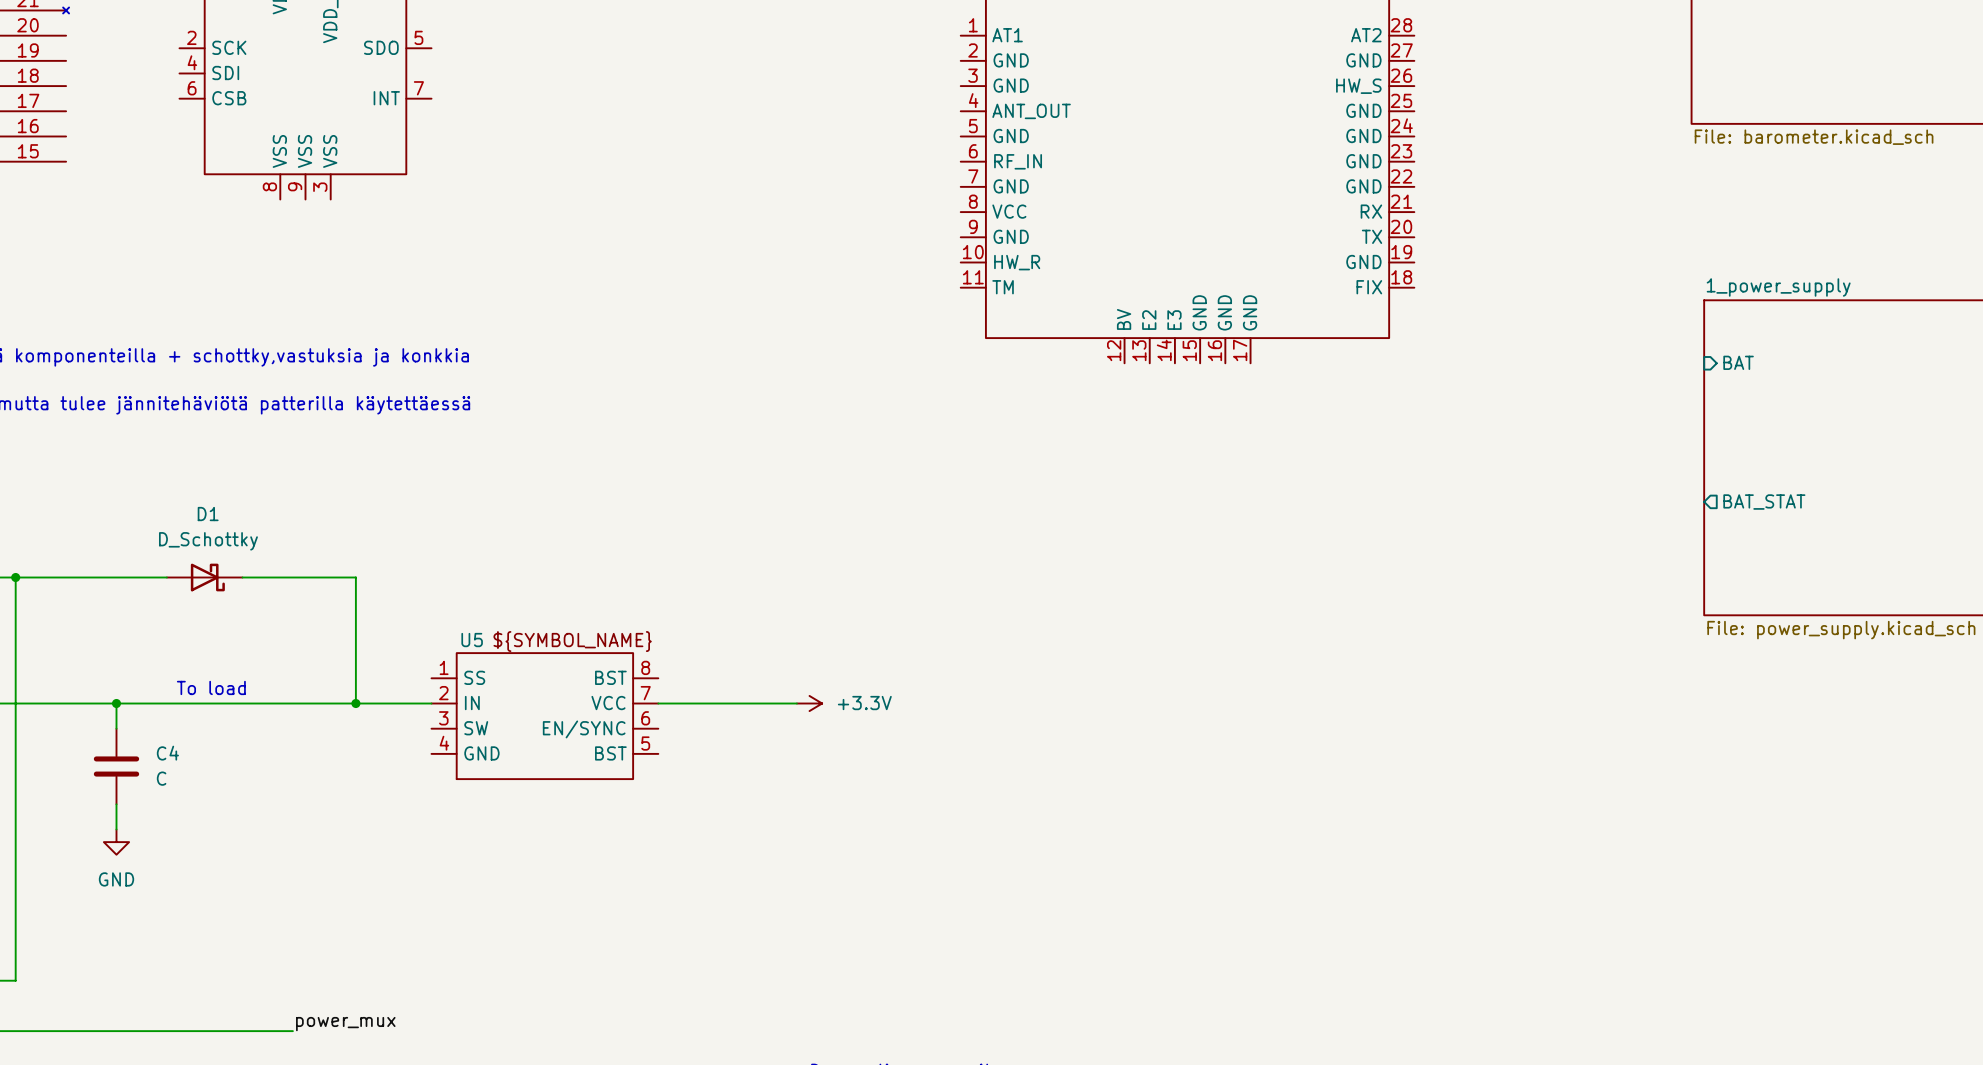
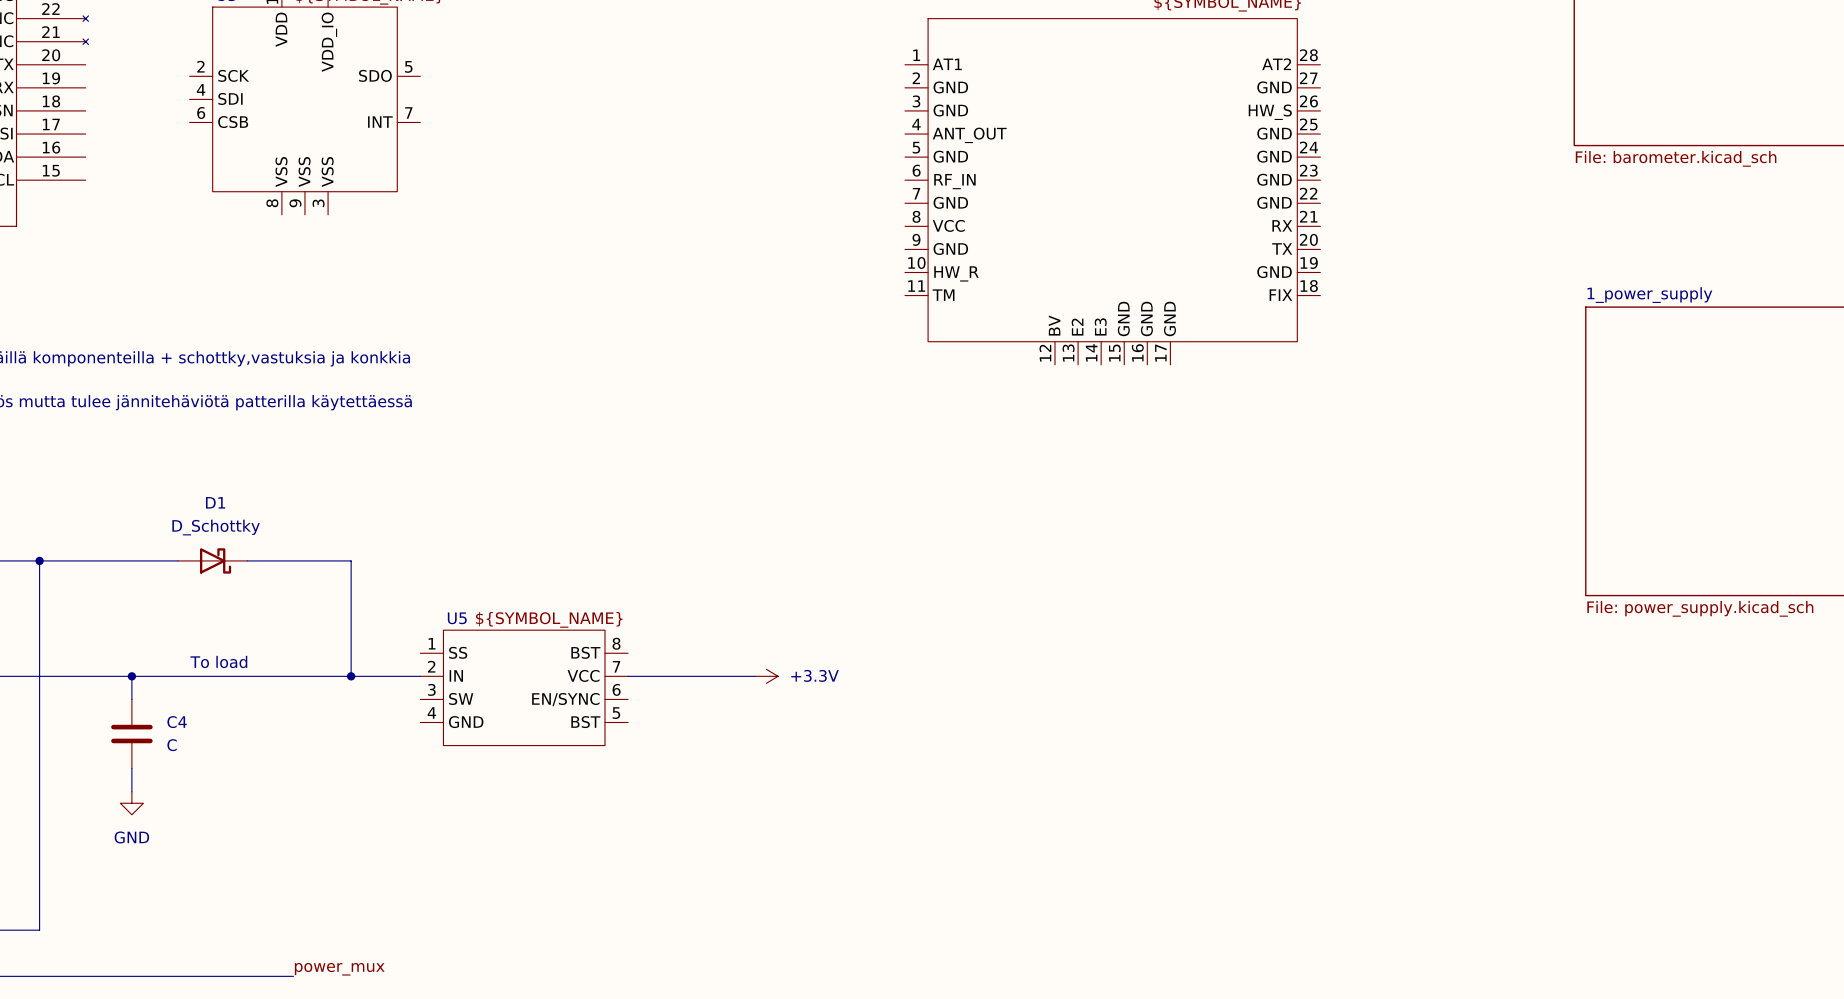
sheet pin: BAT (1738, 362) -> none
sheet pin: BAT_STAT (1764, 502) -> none

